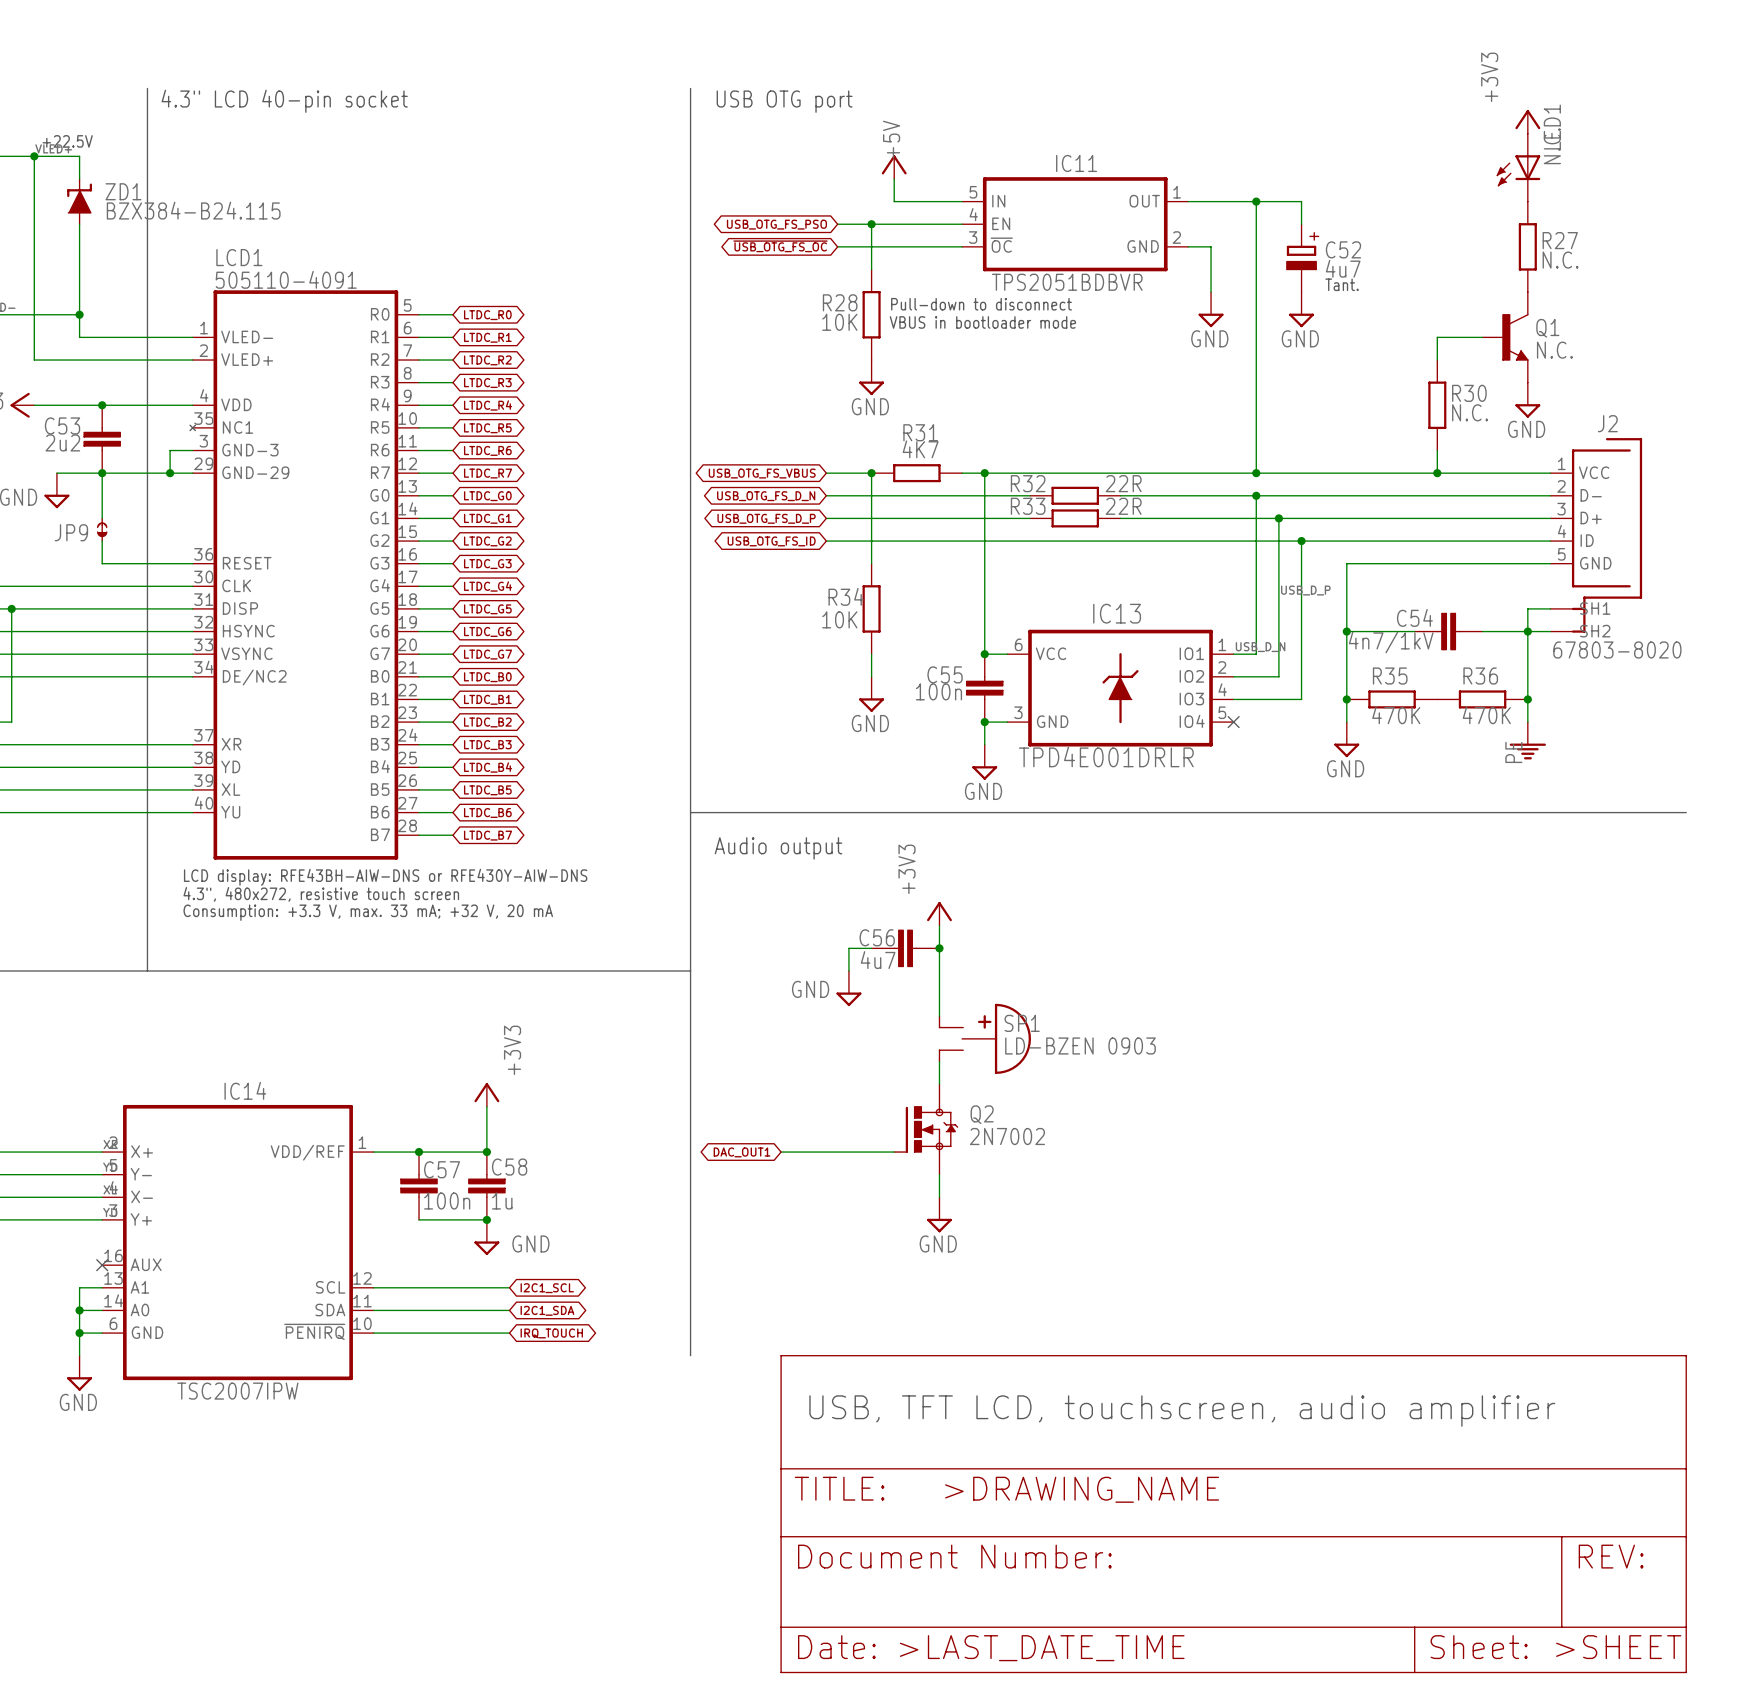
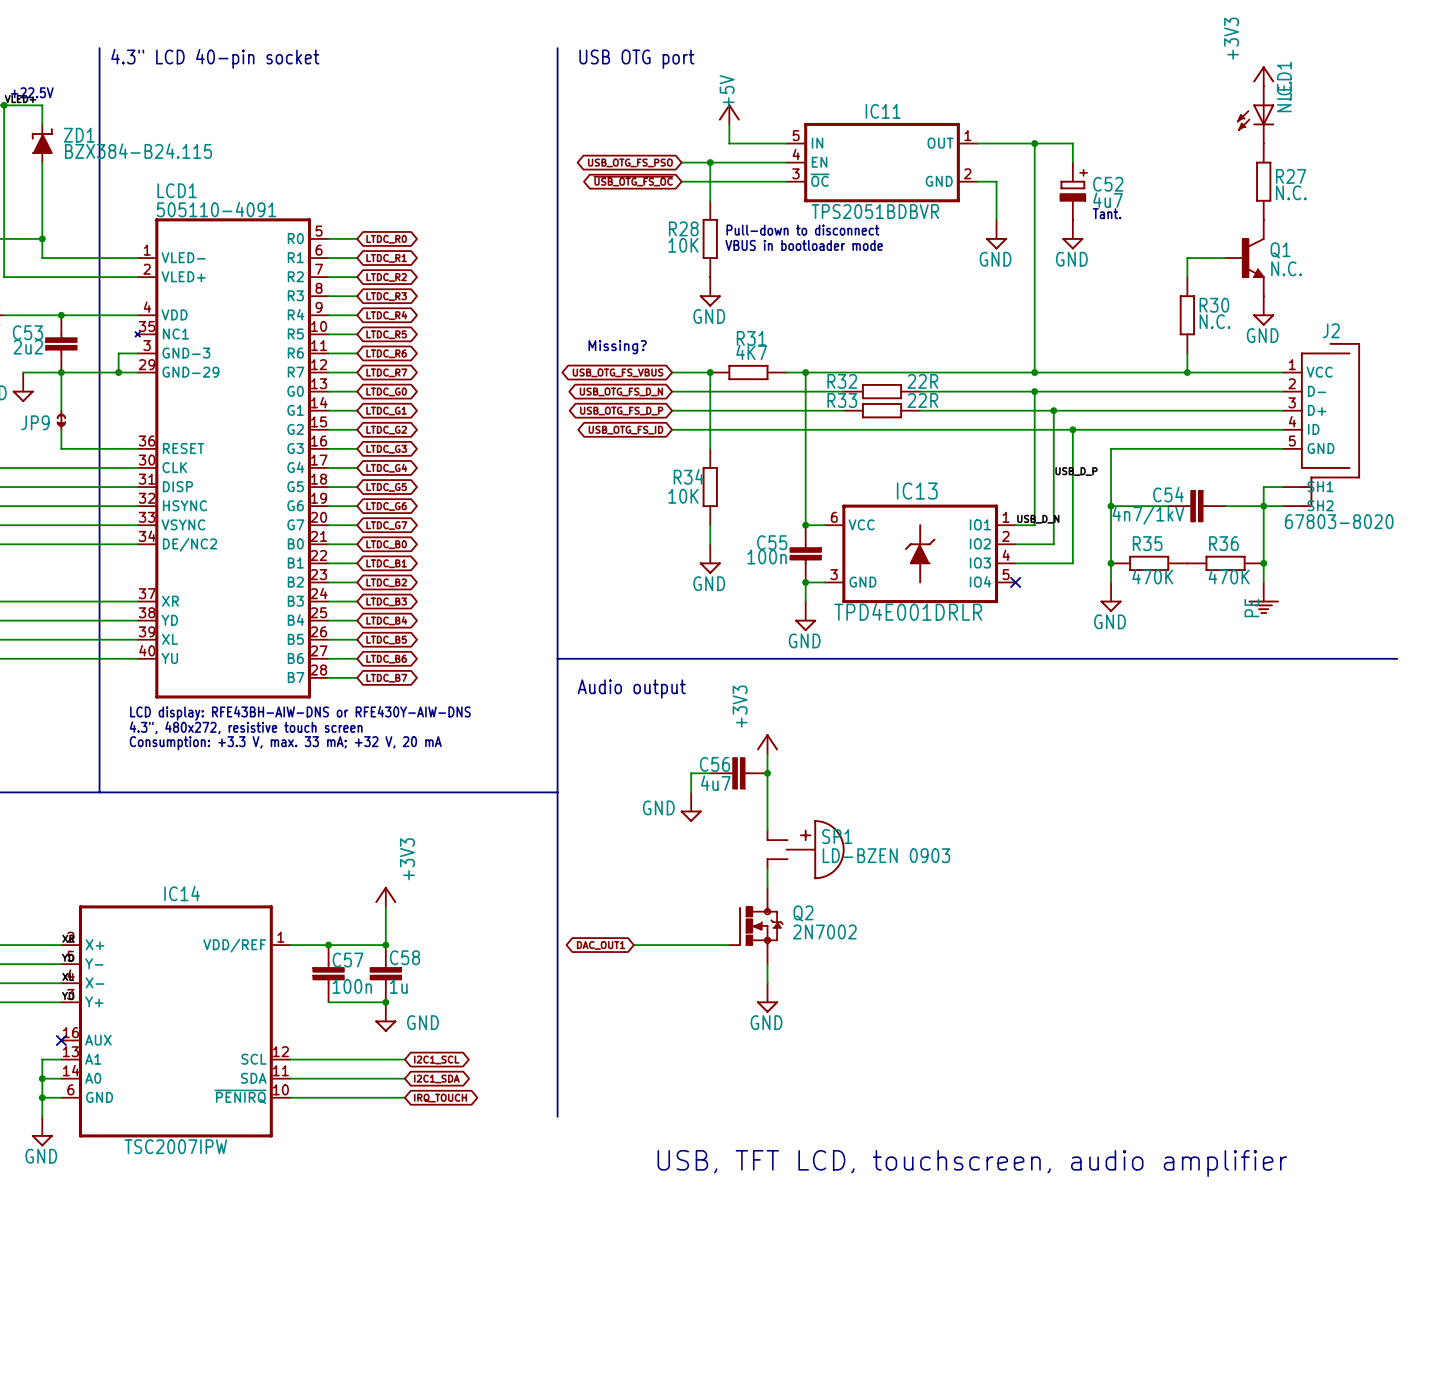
text: none -> Missing? (617, 347)
power symbol: (1233, 1514) -> none

